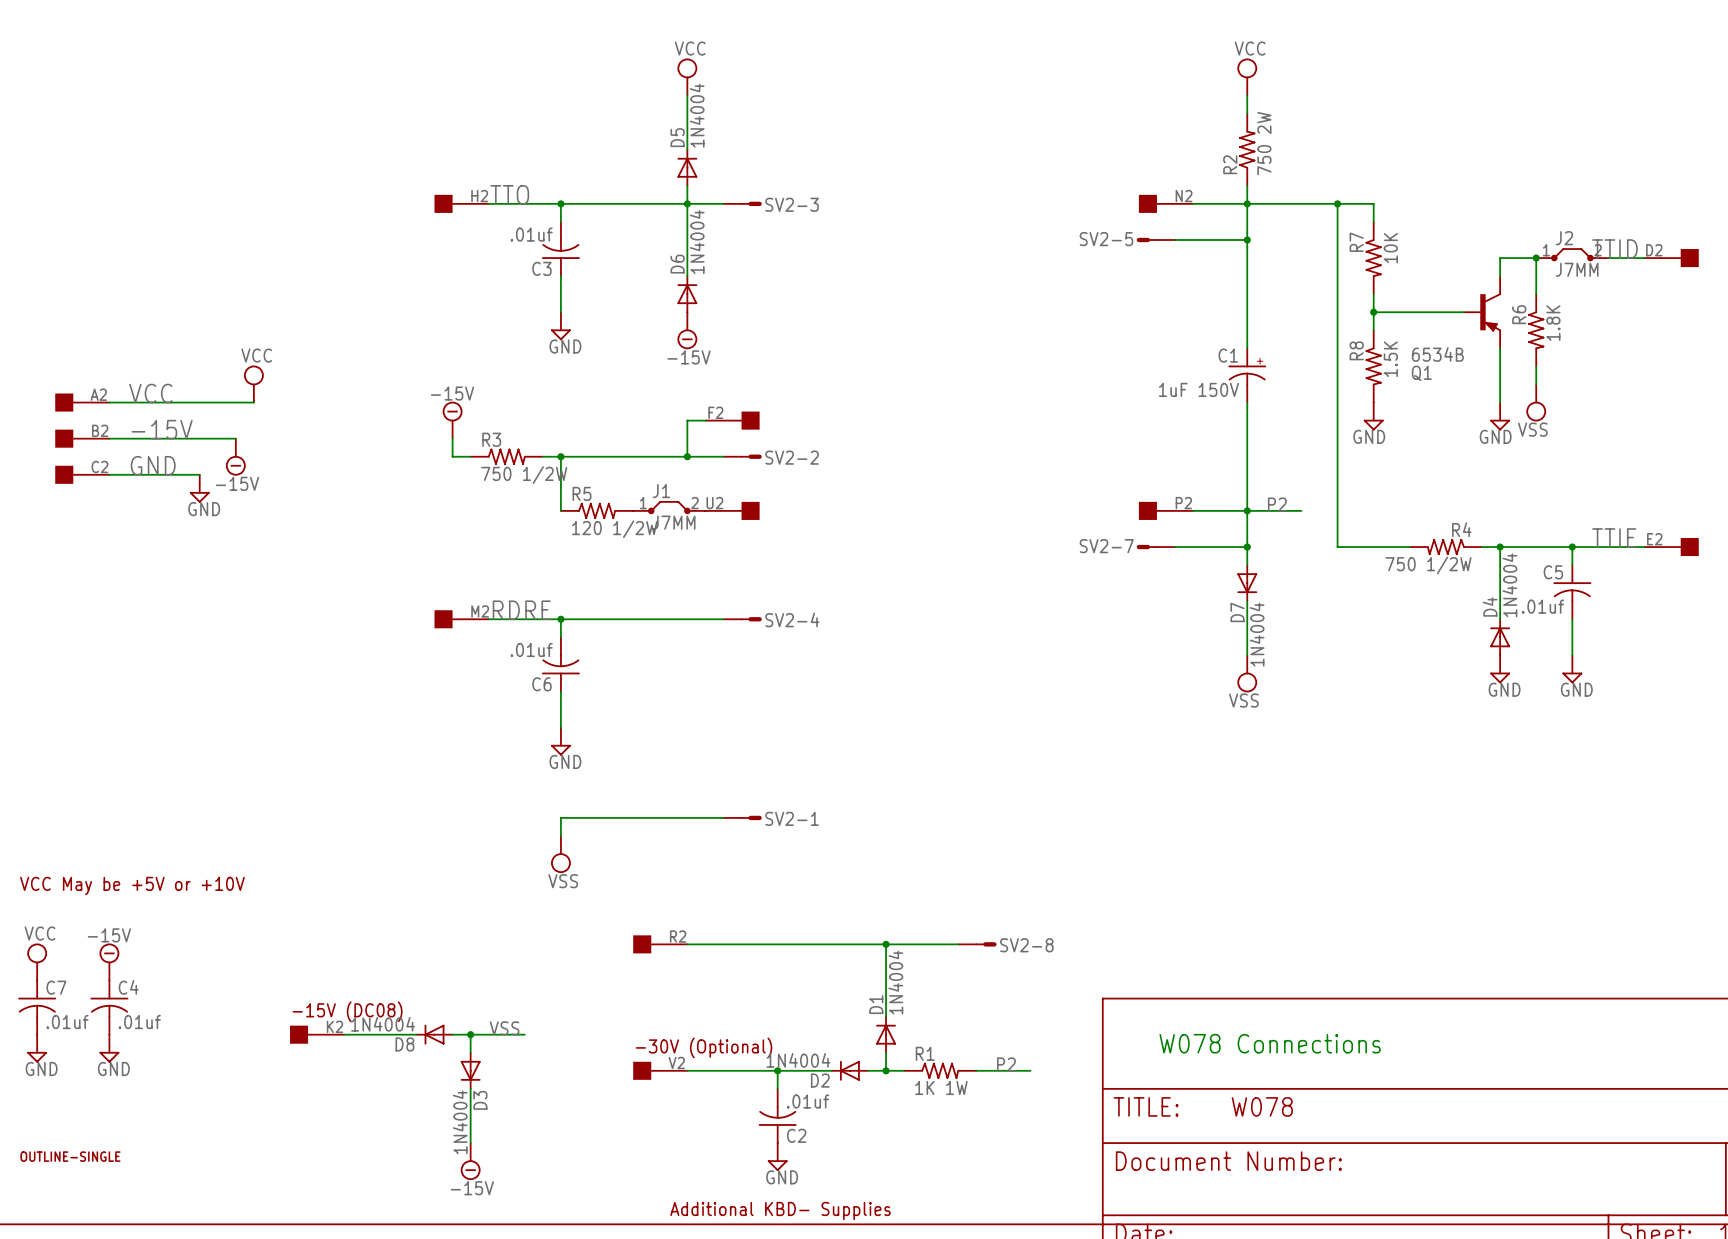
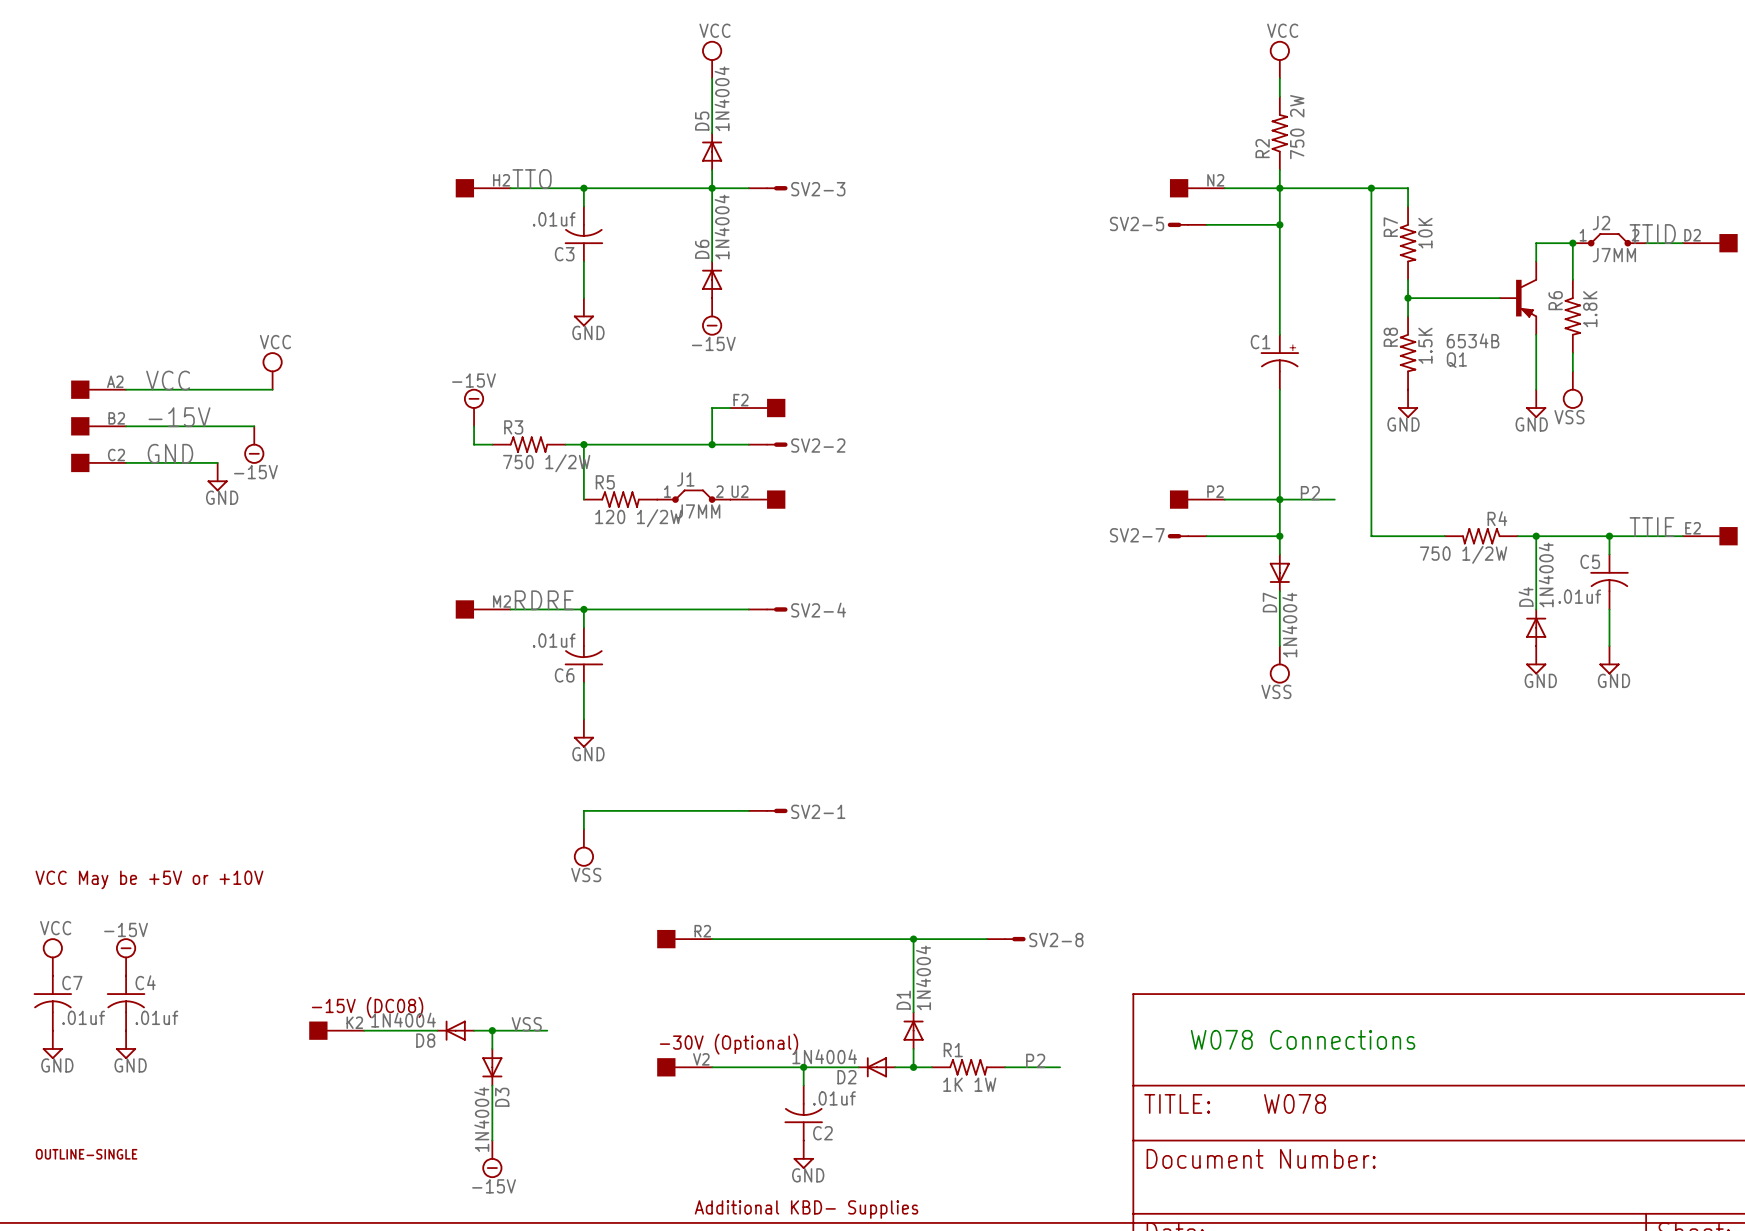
C1 value: 1uF 150V (1199, 389) -> none

